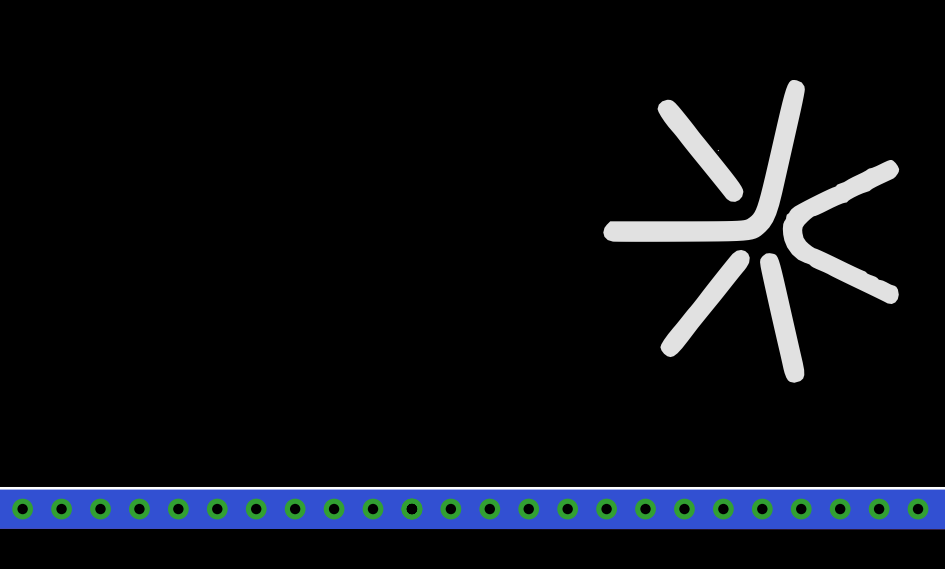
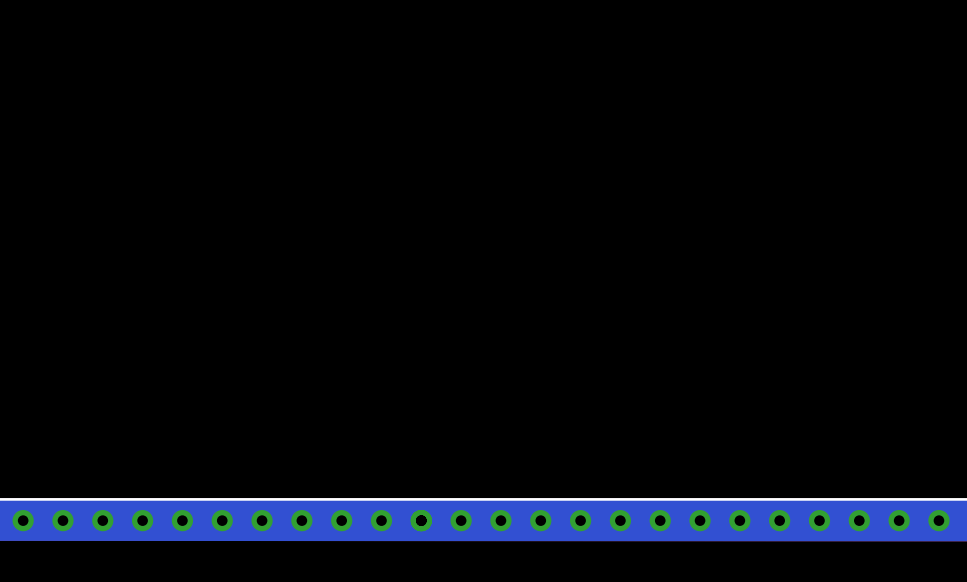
drawing: [603, 79, 900, 383] -> none

